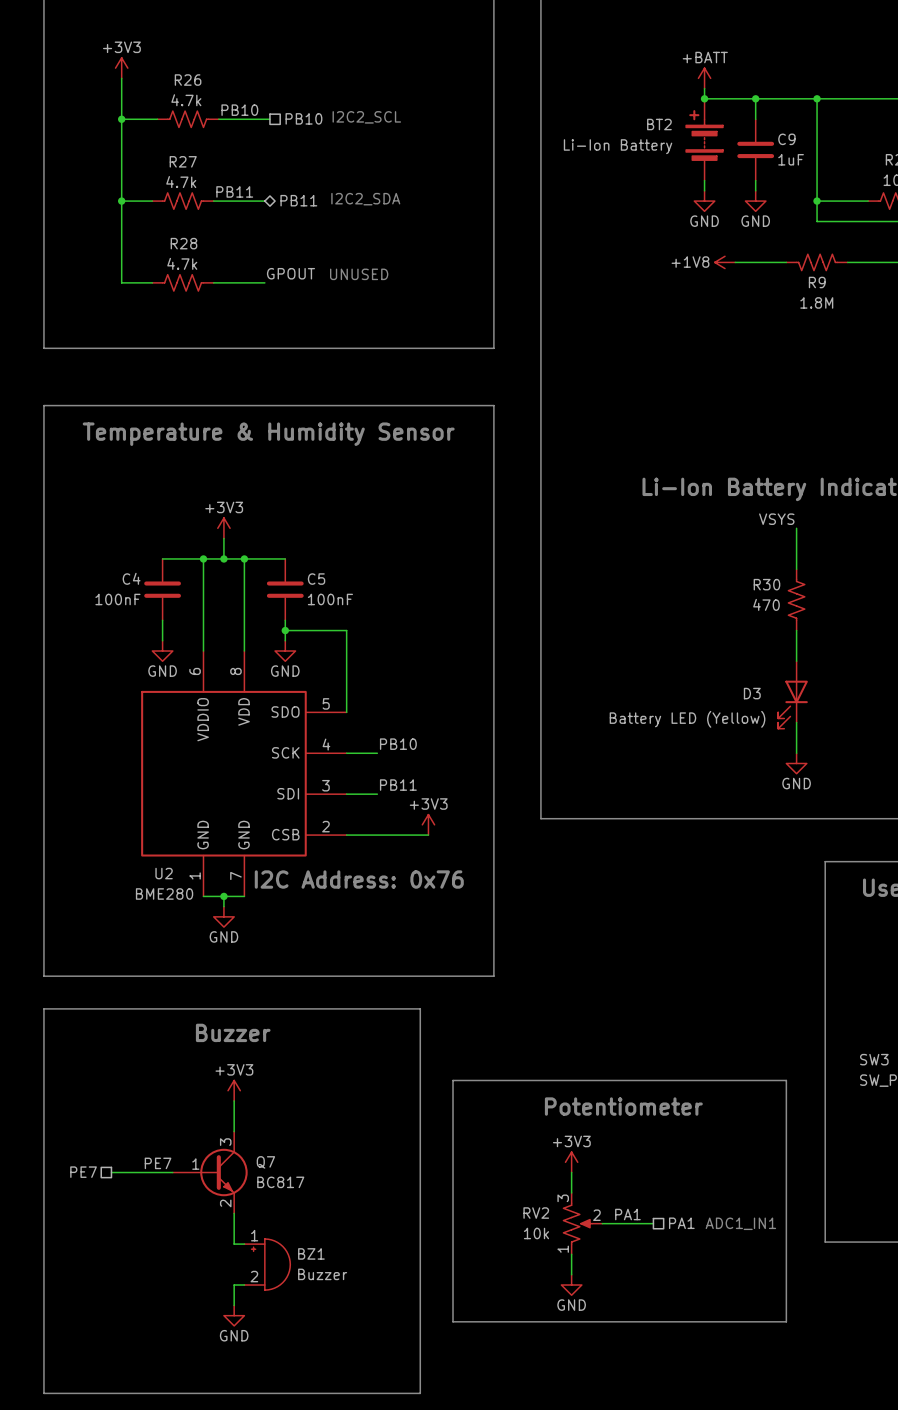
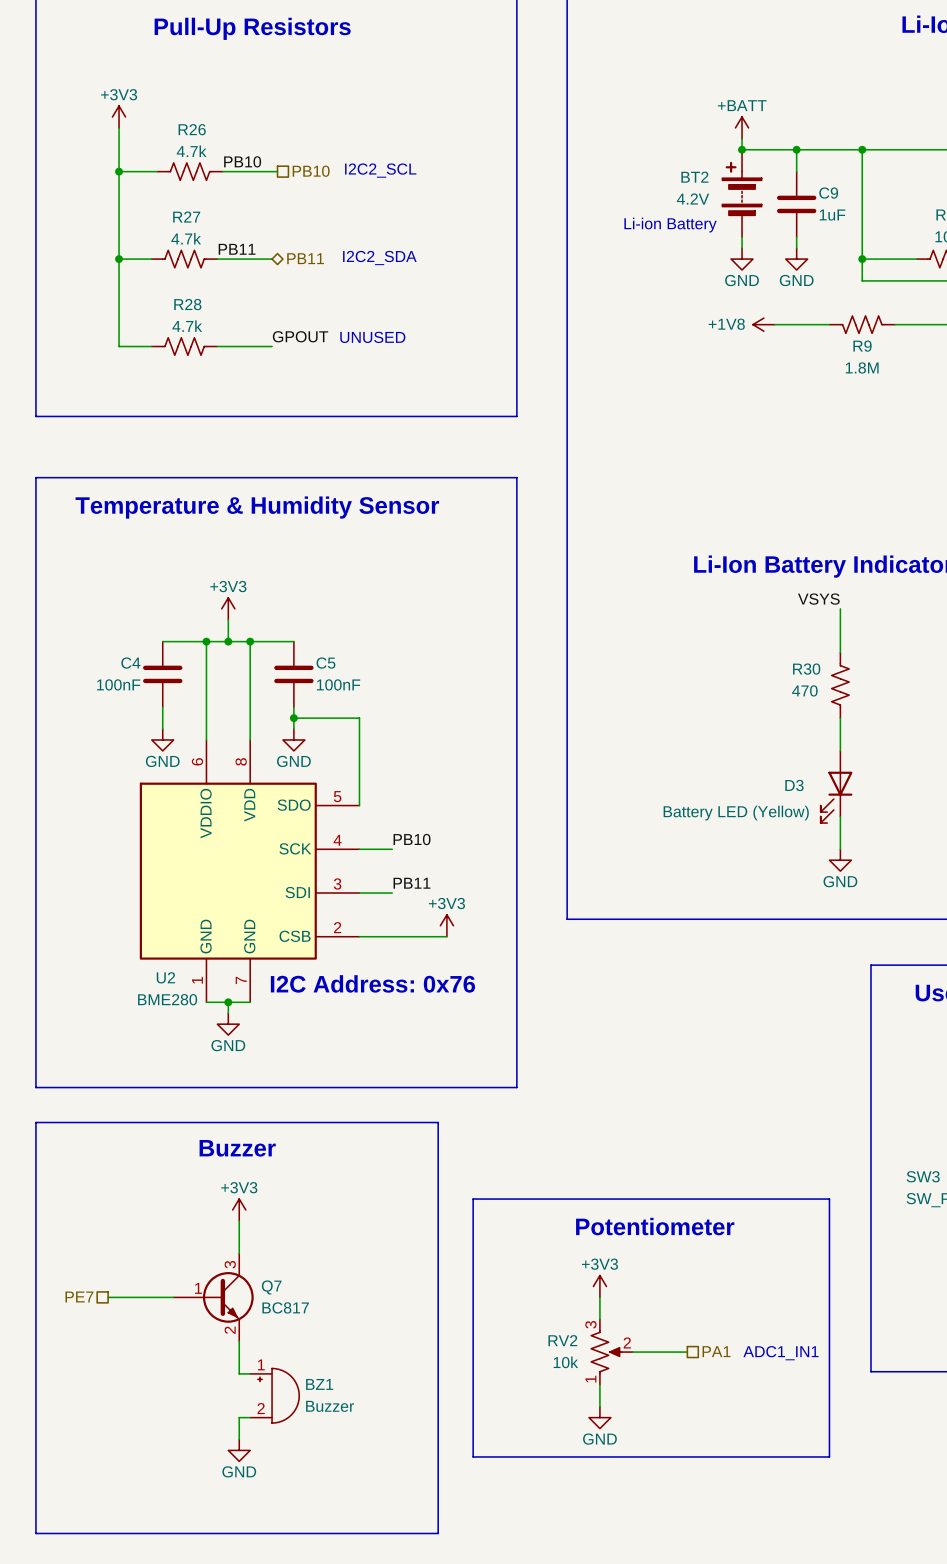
BT2 value: Li-Ion Battery (618, 146) -> 4.2V (693, 199)
text: none -> Li-ion Battery (670, 225)
label: PE7 (158, 1163) -> none
label: PA1 (627, 1214) -> none

